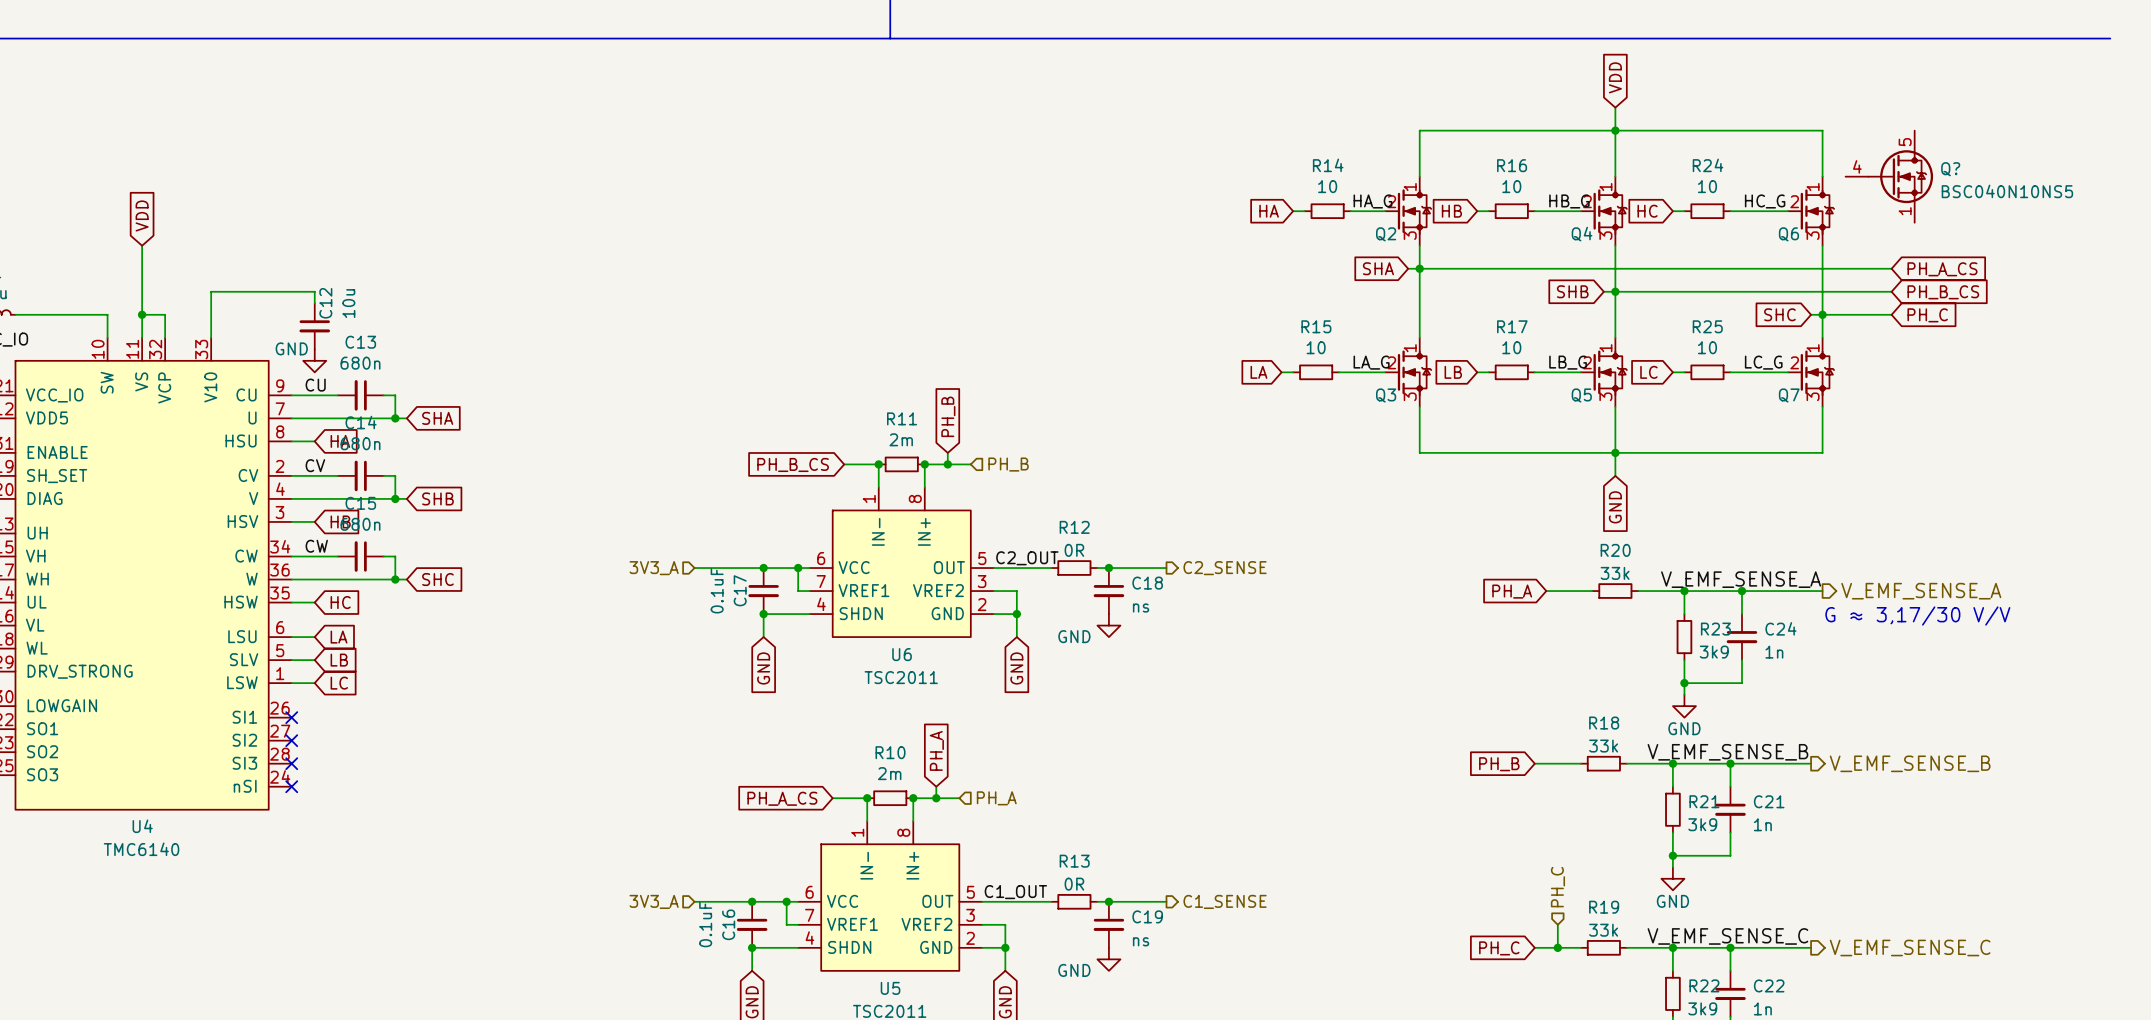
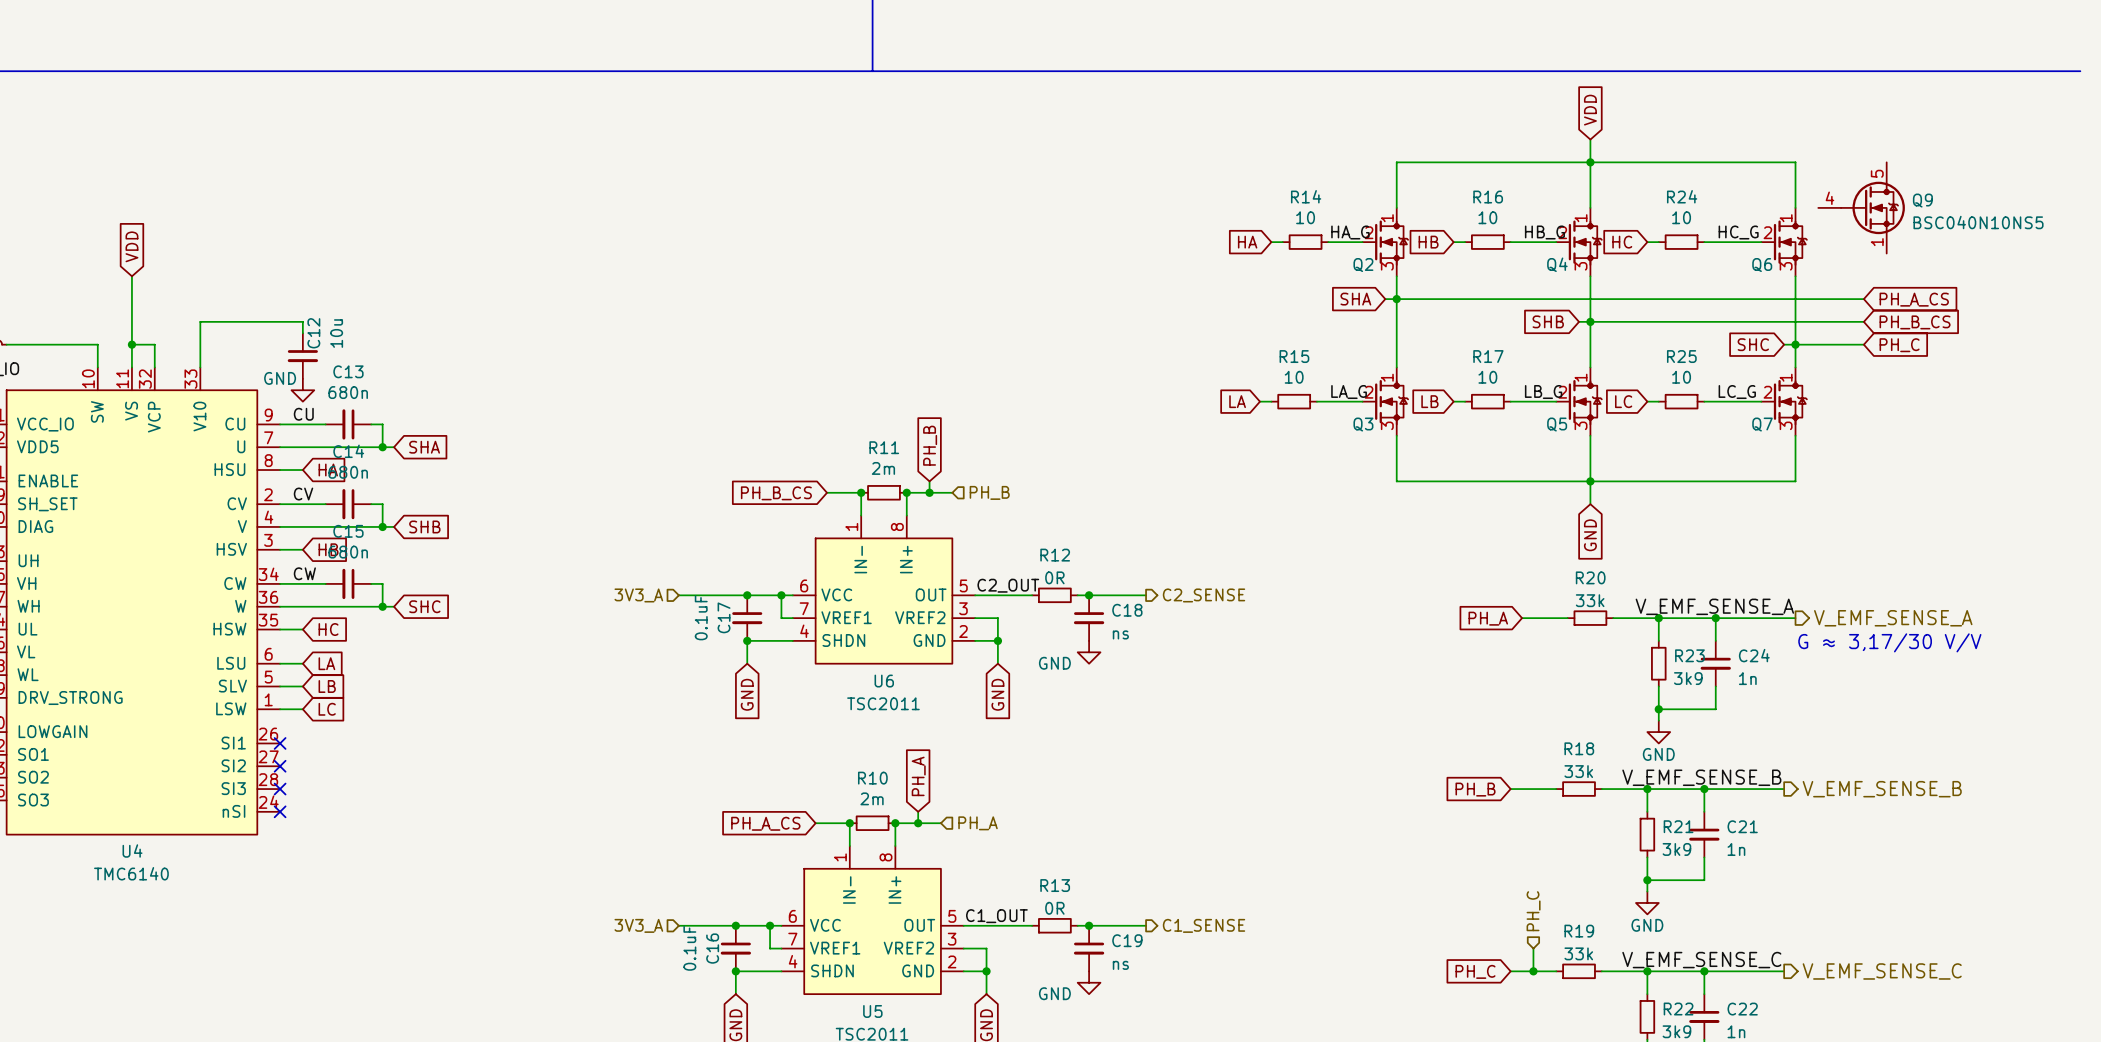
Q? name: Q? (1950, 169) -> Q9 (1922, 200)

